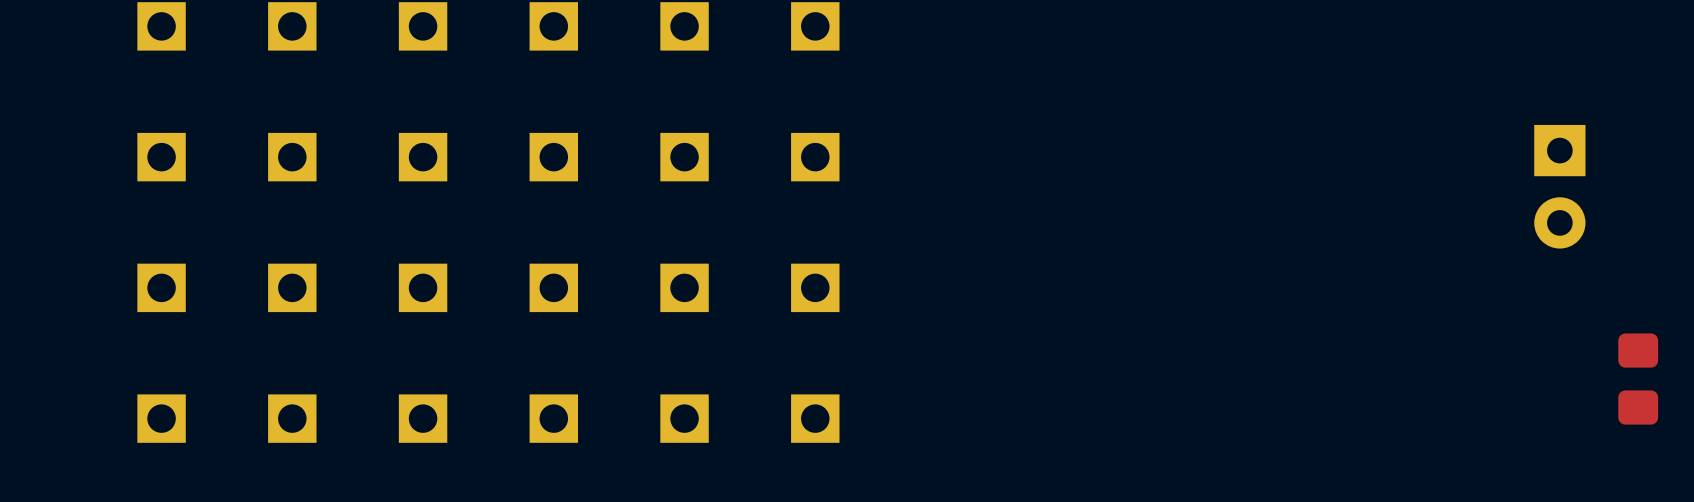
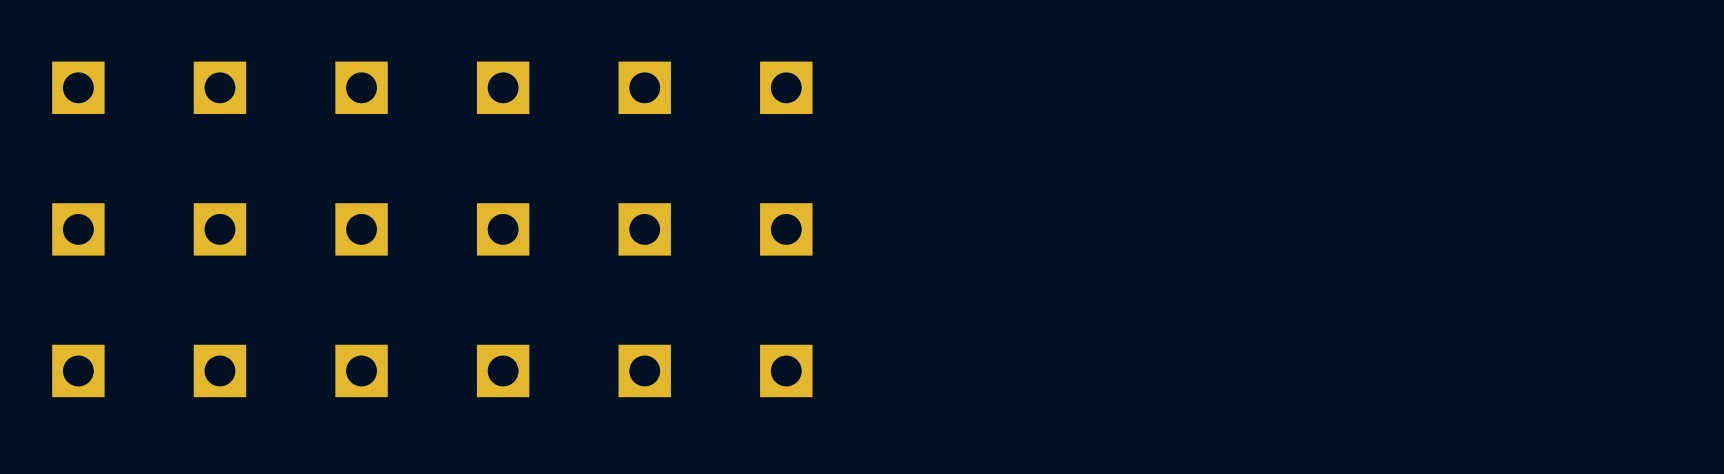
part: (1559, 186) -> none
part: (1638, 379) -> none

